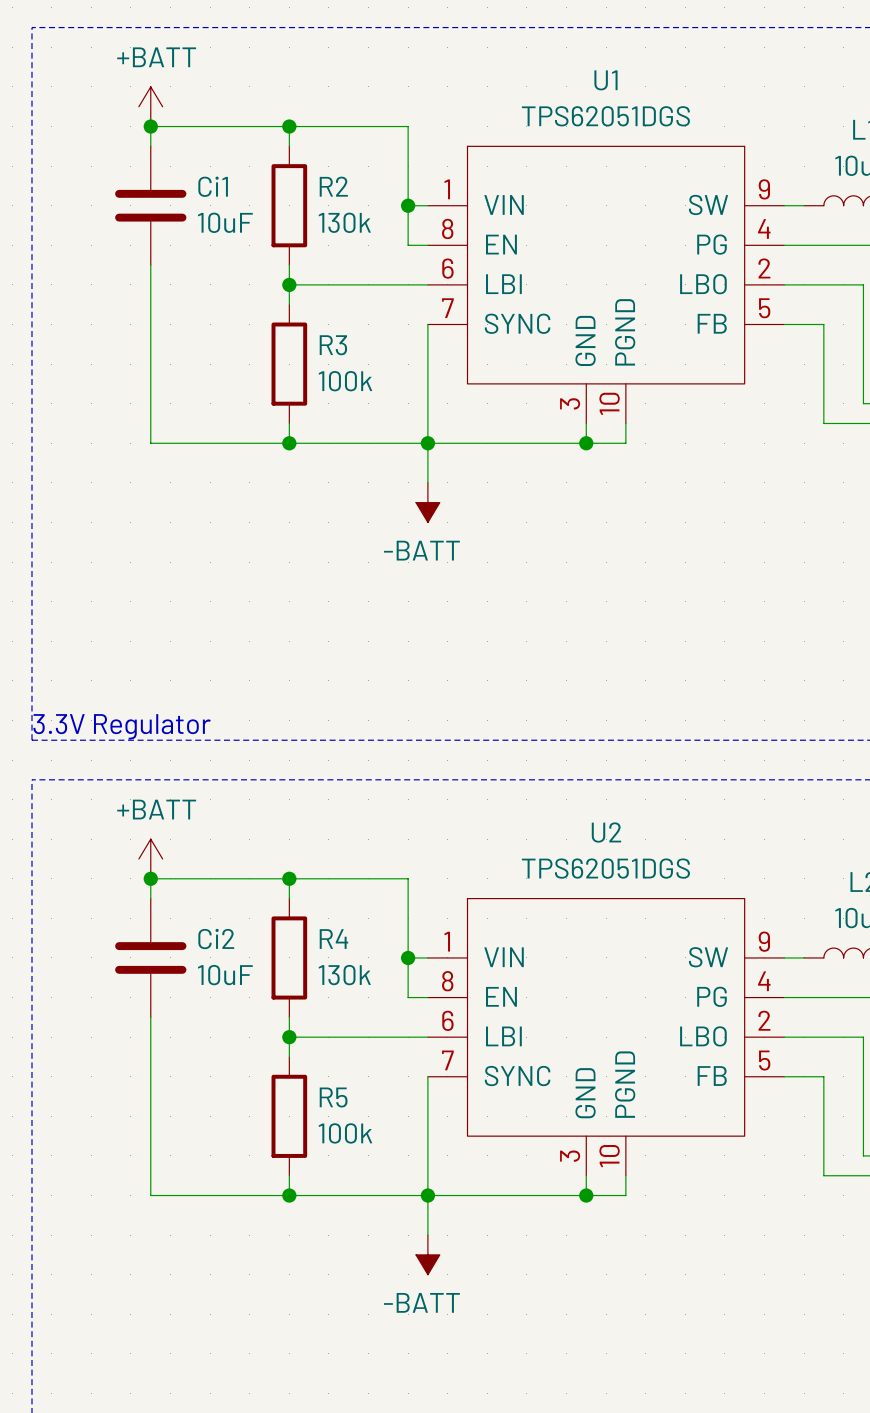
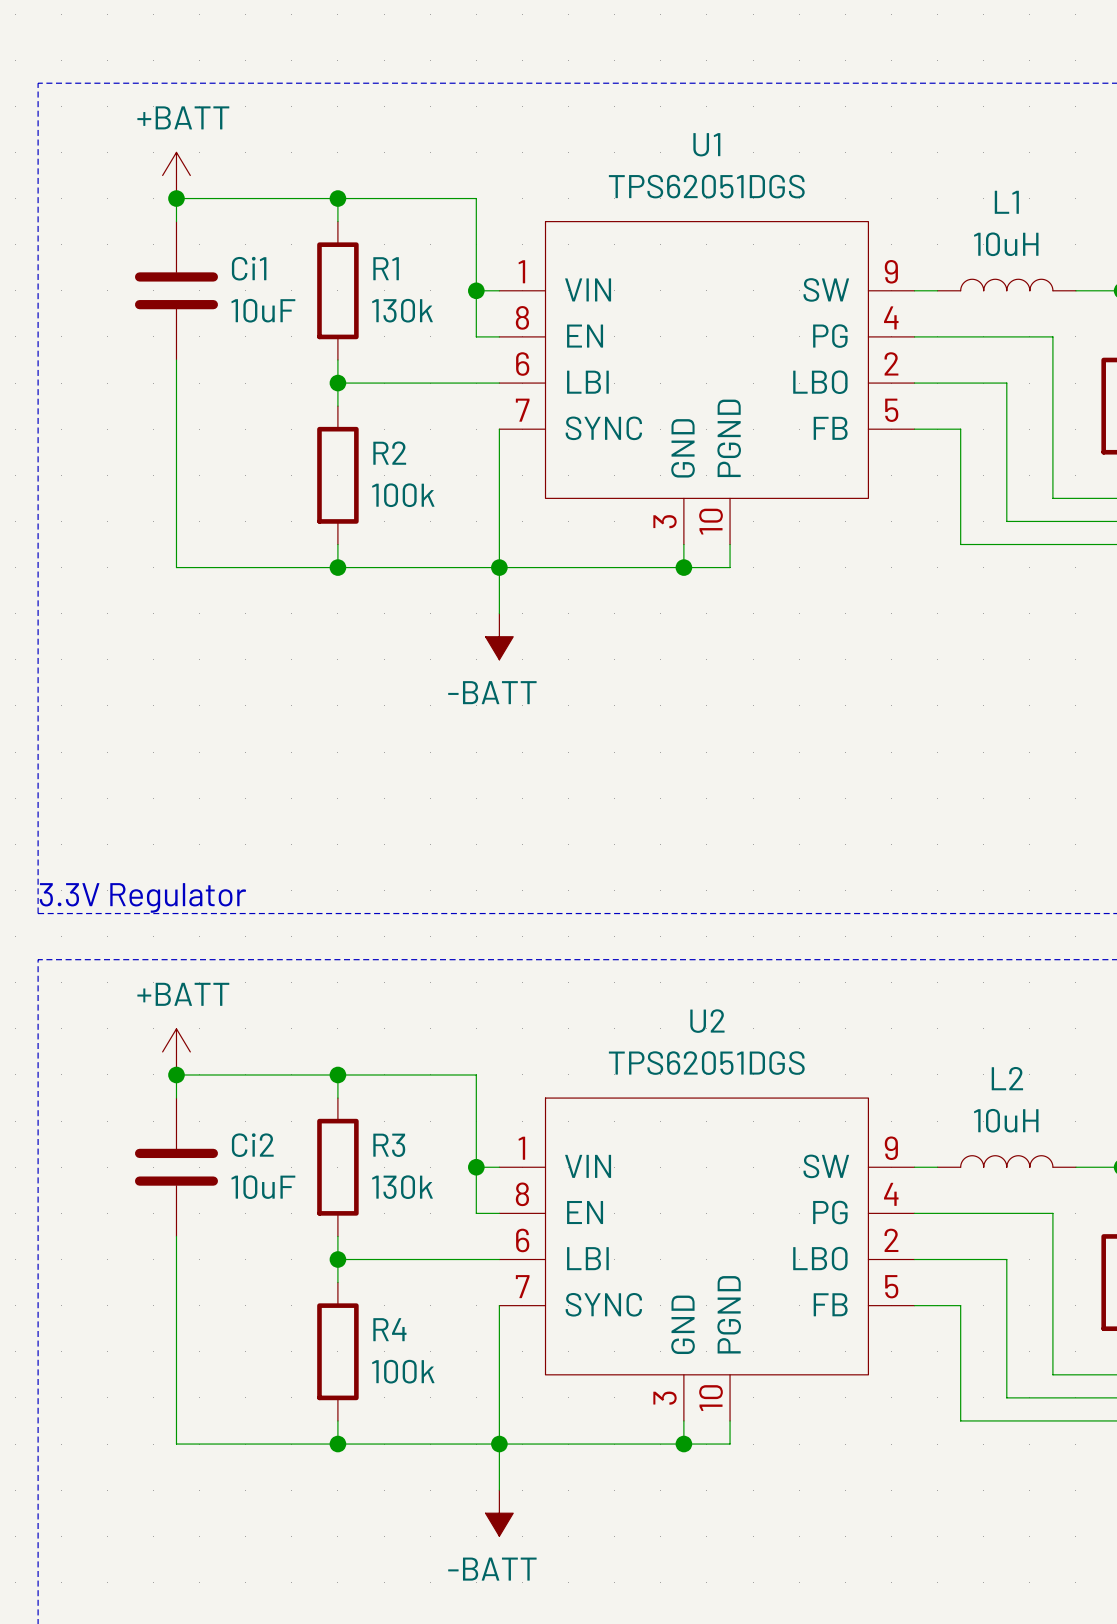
R2 name: R2 (333, 186) -> R1 (386, 268)
R3 name: R3 (333, 345) -> R2 (389, 453)
R4 name: R4 (333, 939) -> R3 (389, 1145)
R5 name: R5 (333, 1097) -> R4 (389, 1329)

